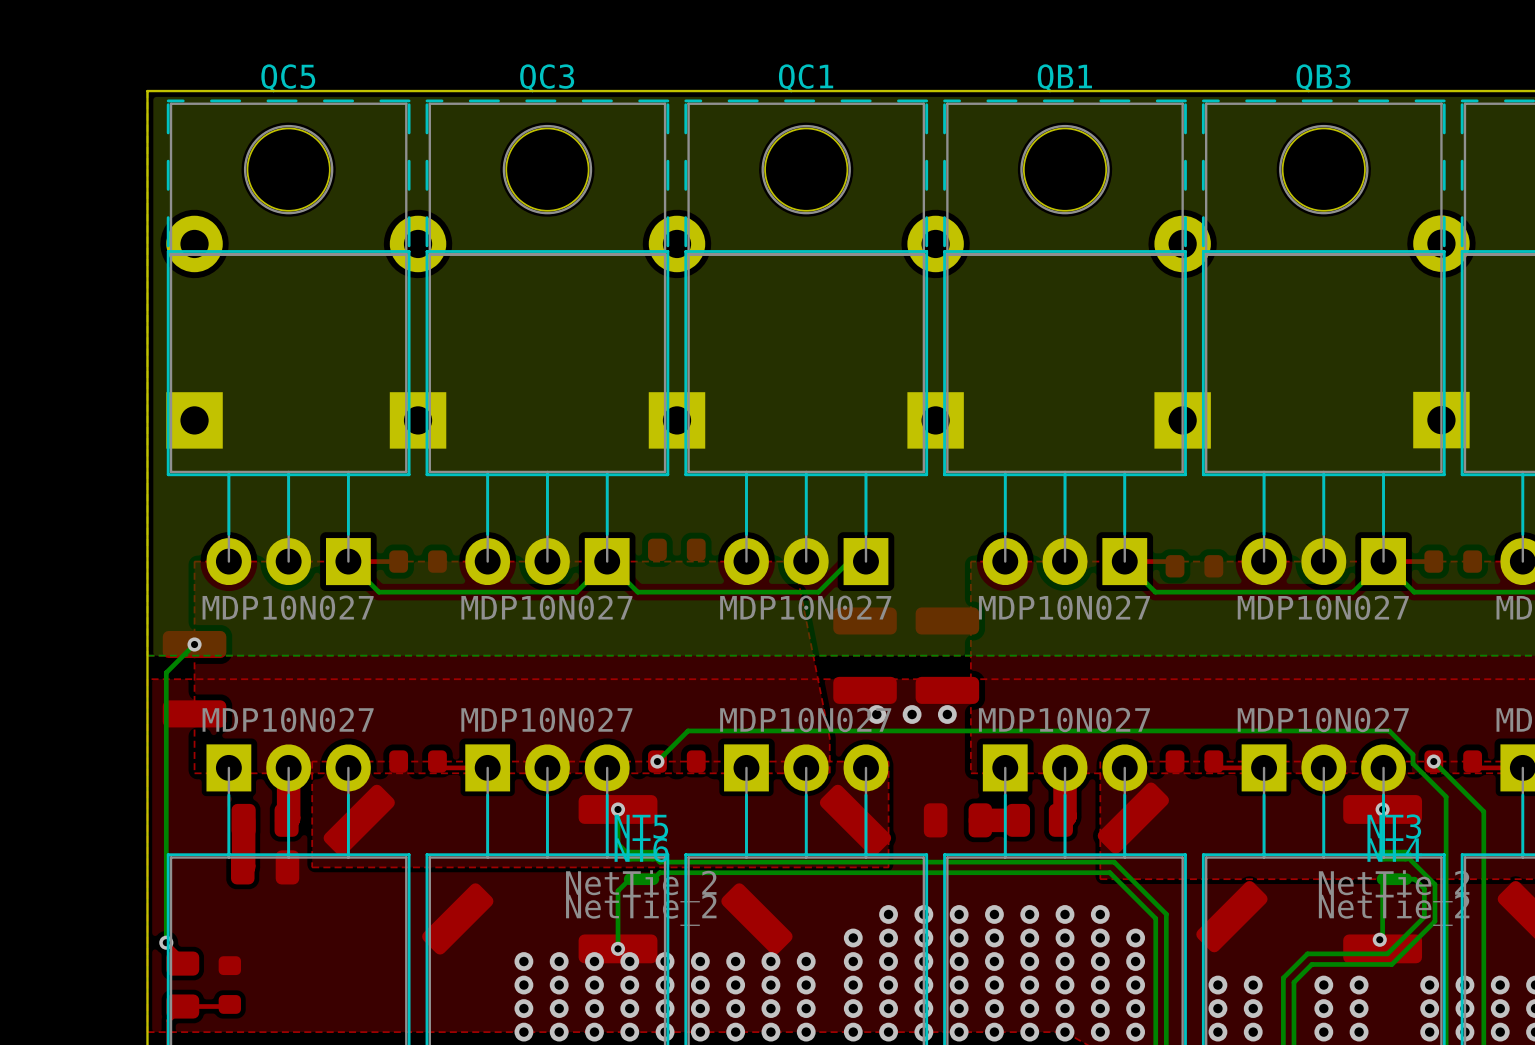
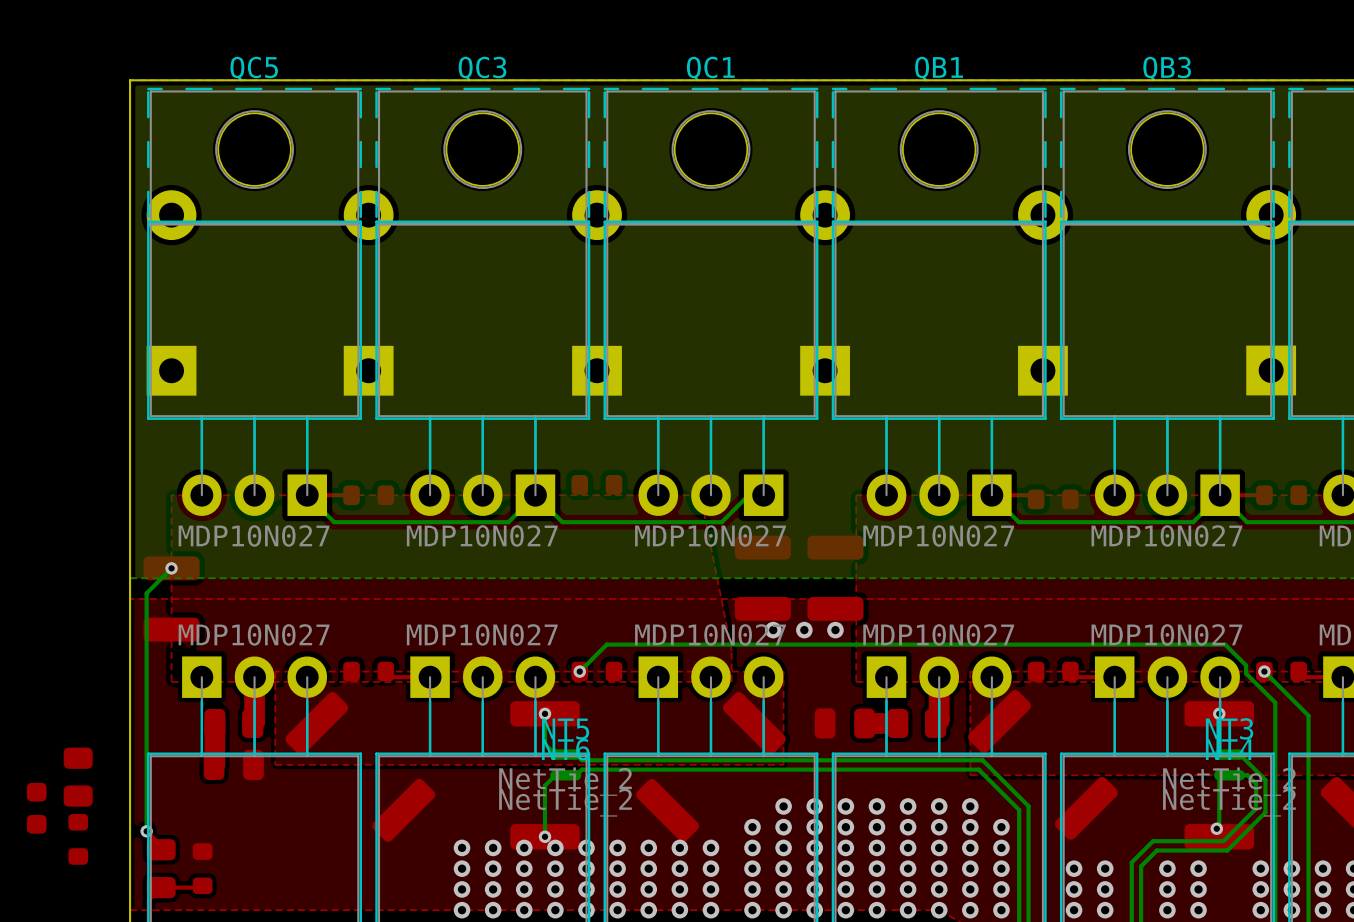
part: none -> (78, 777)
part: none -> (36, 808)
part: none -> (78, 839)

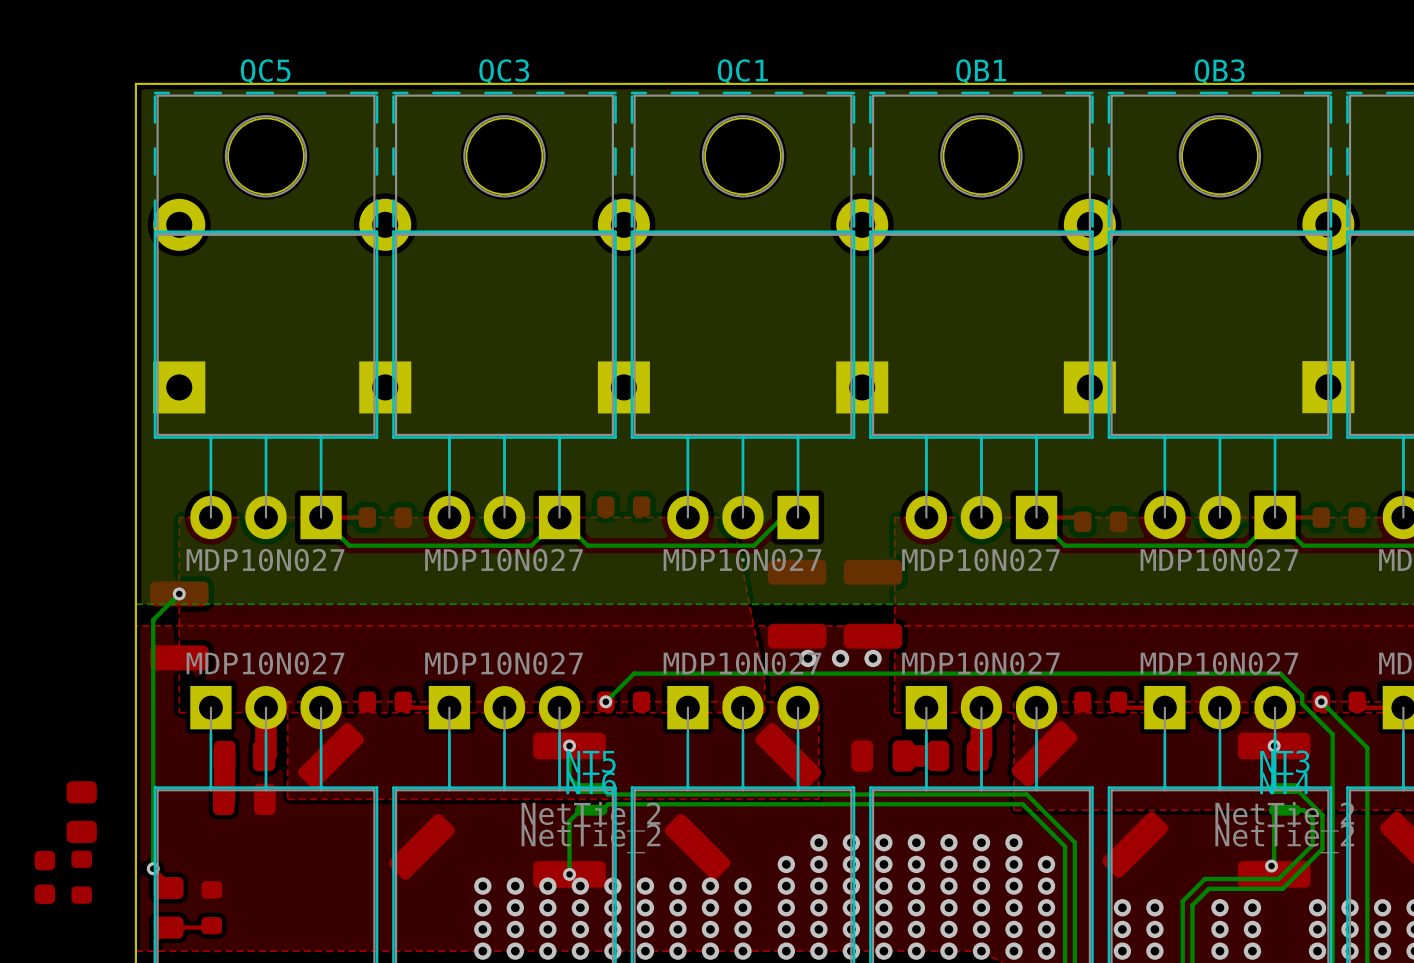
part position: (36, 808) -> (44, 877)

